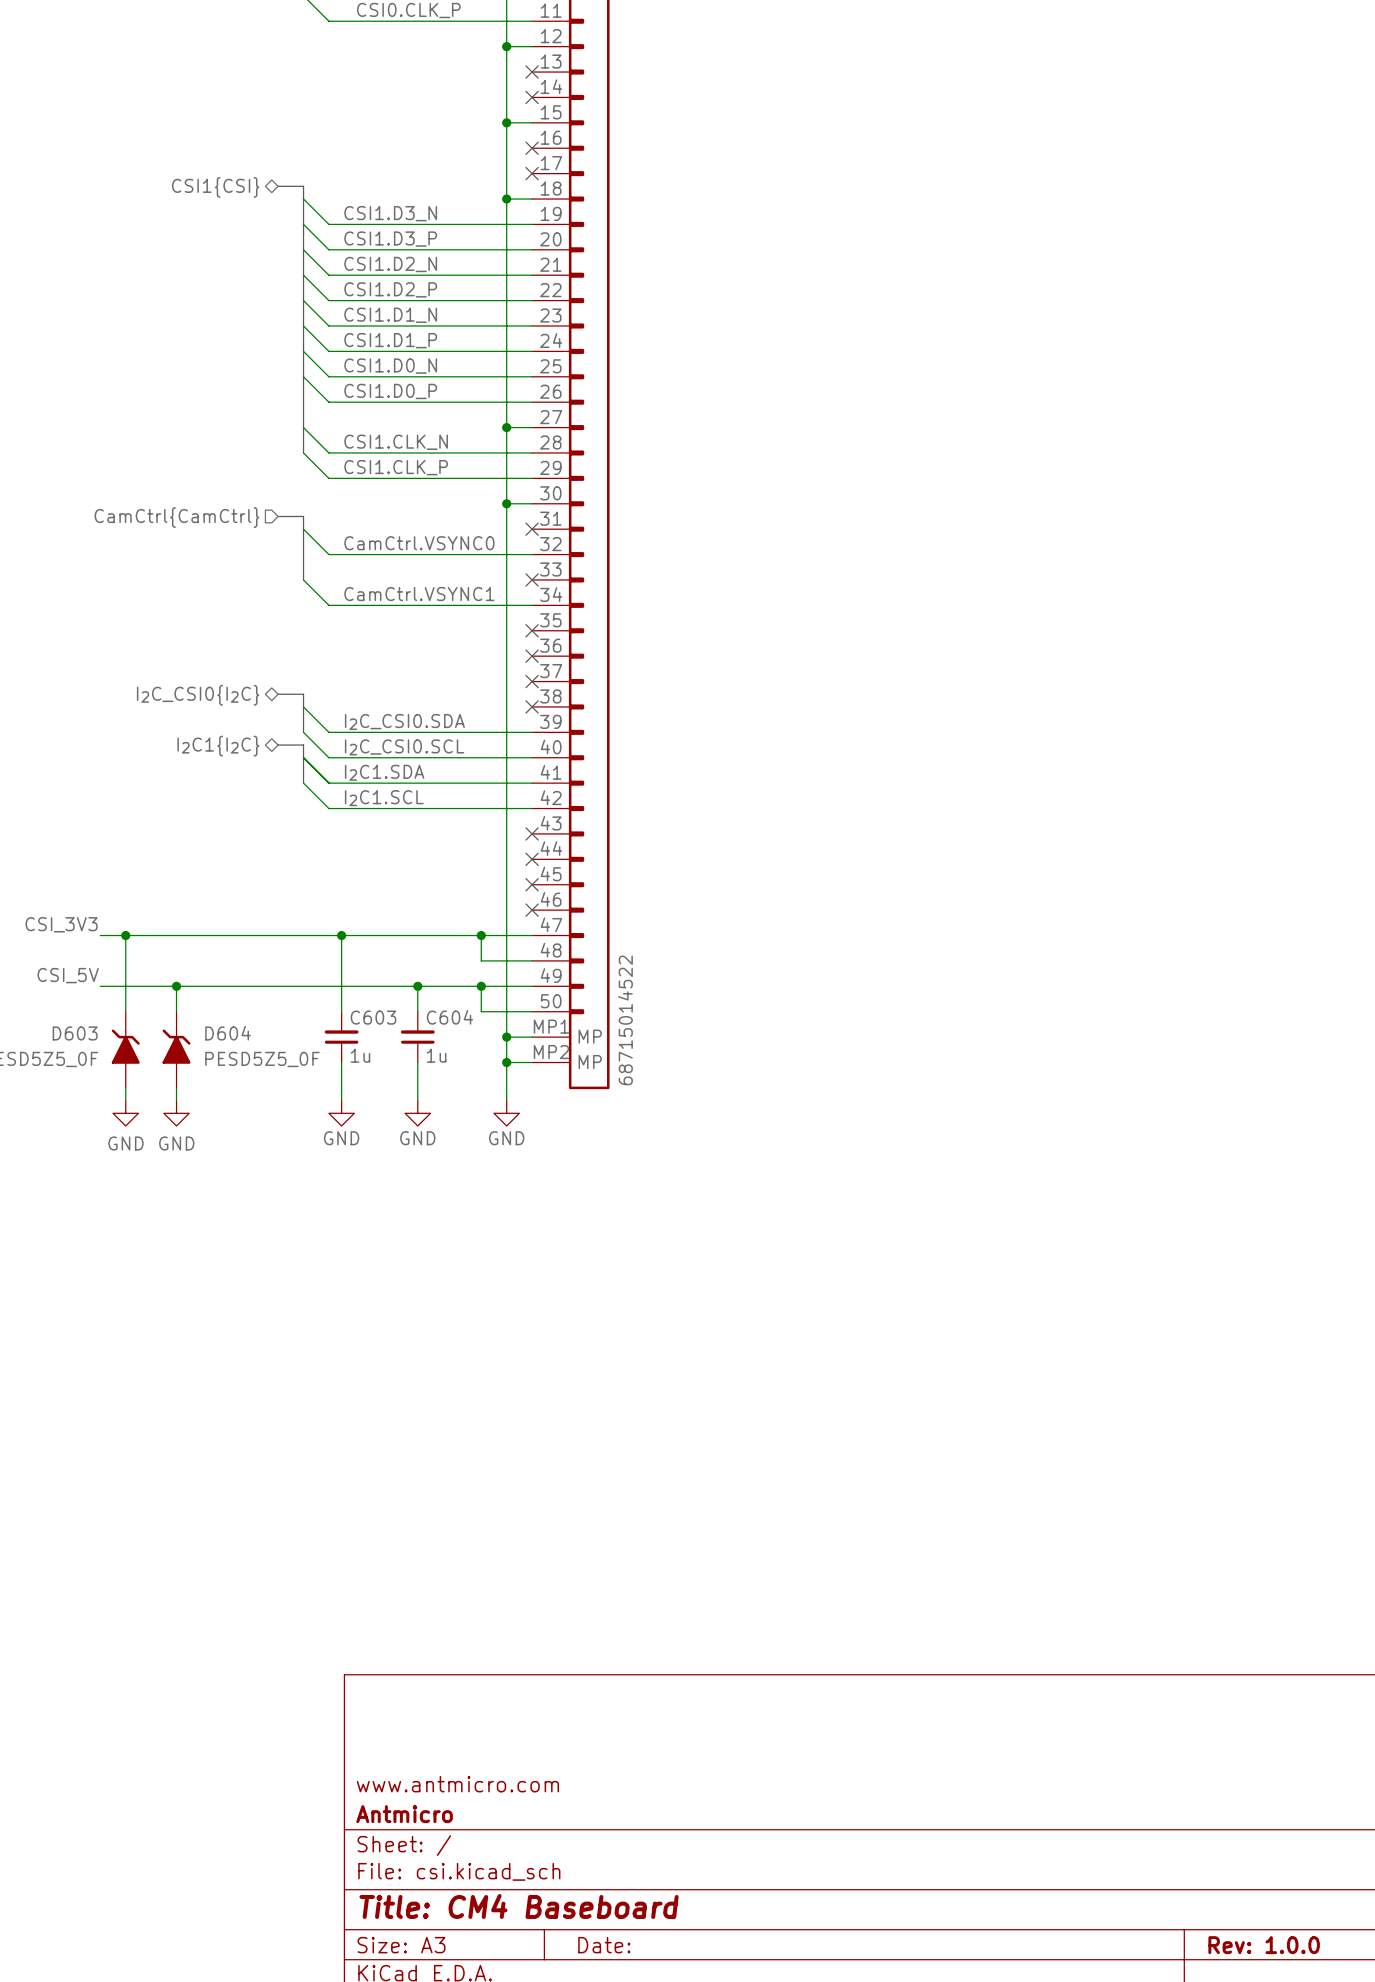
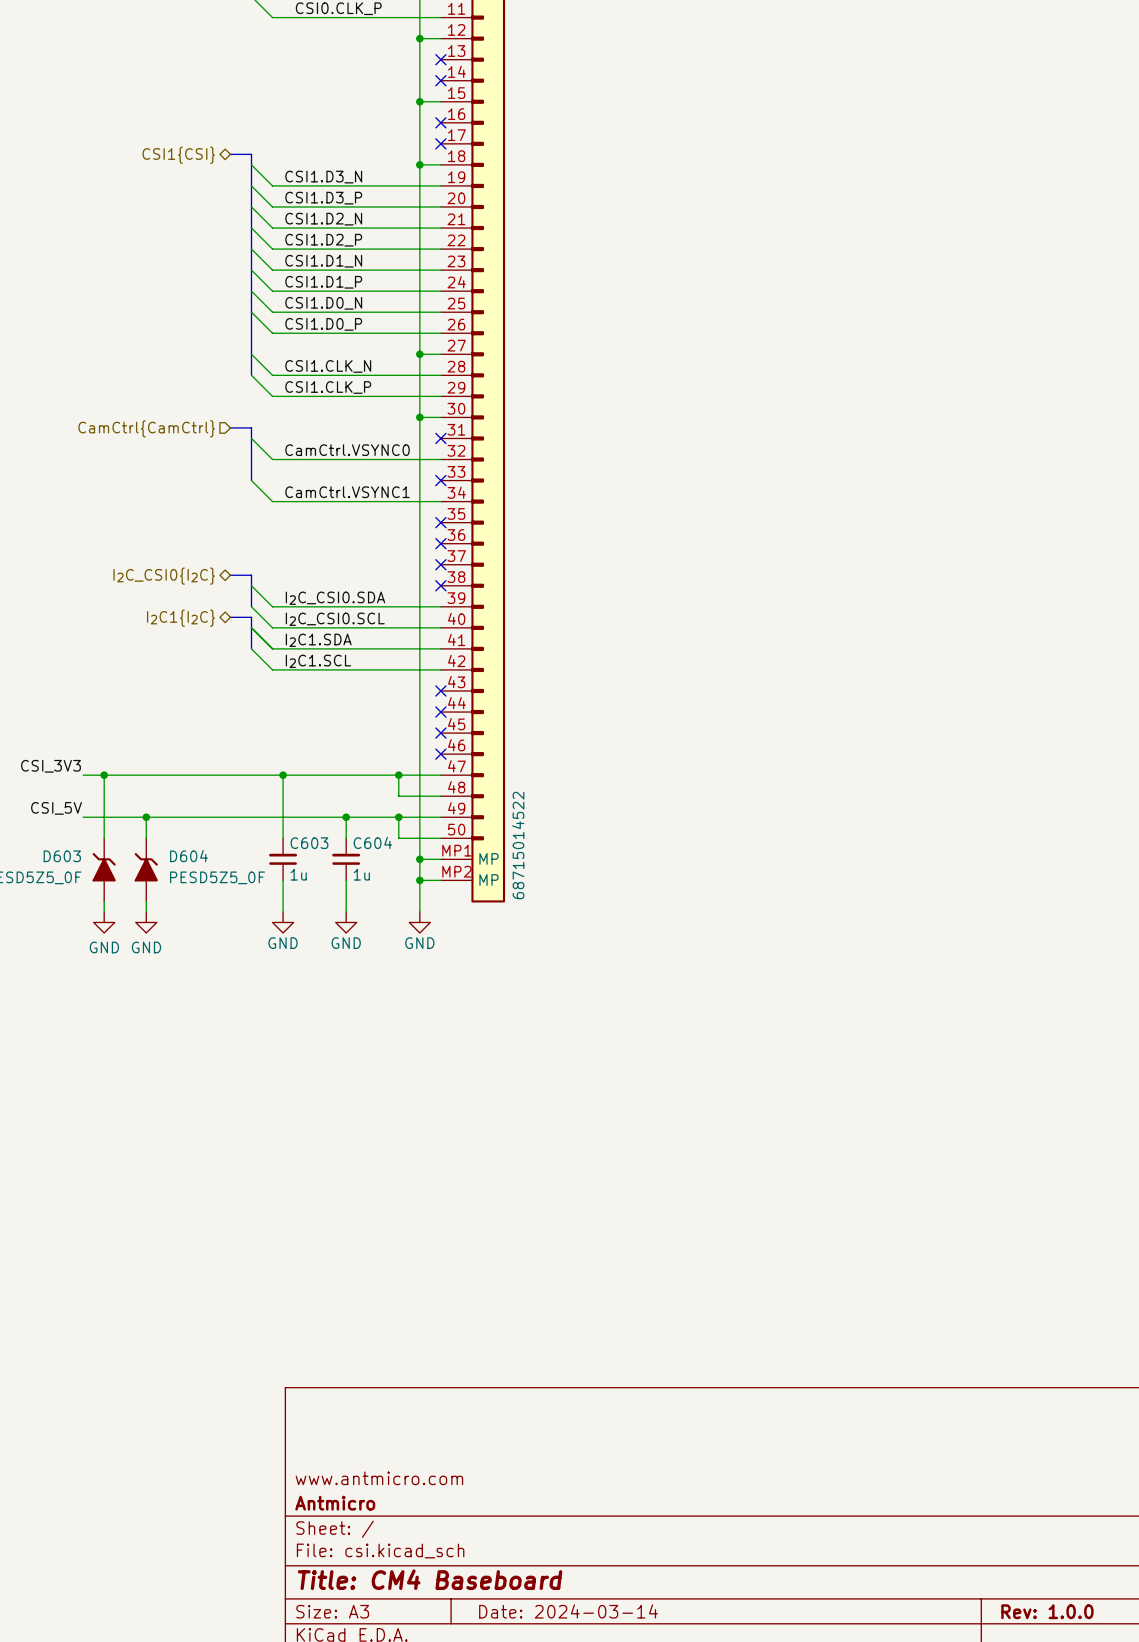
title block: Date: (604, 1945) -> Date: 2024-03-14 (568, 1611)

